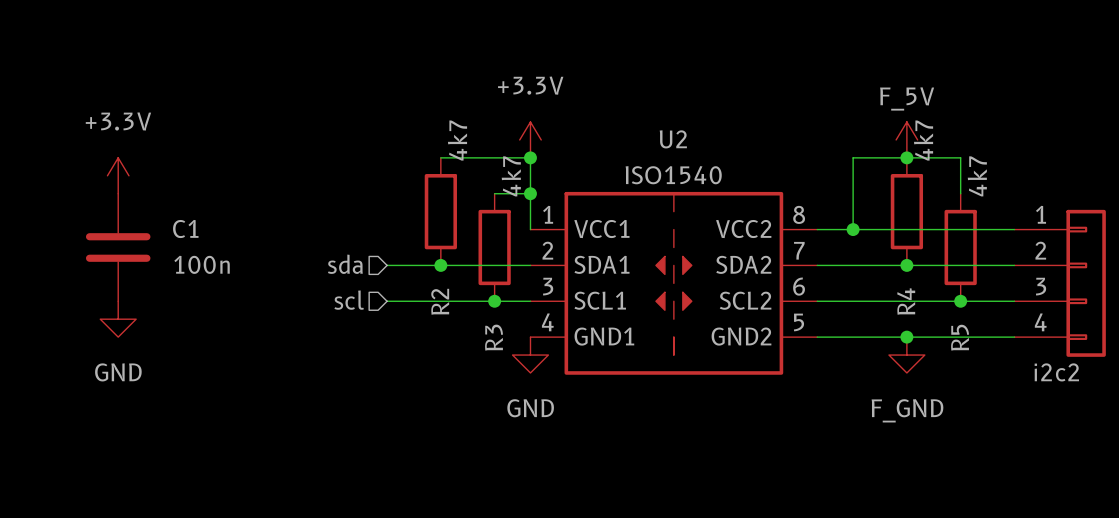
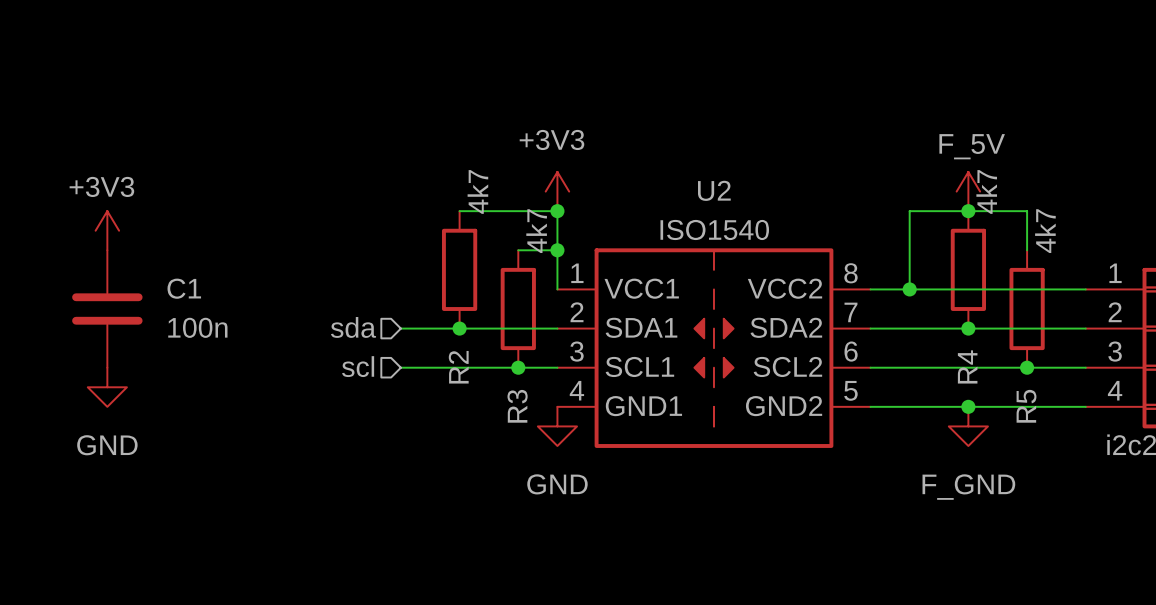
power symbol: +3.3V (530, 139) -> +3V3 (557, 191)
power symbol: +3.3V (118, 175) -> +3V3 (107, 230)

